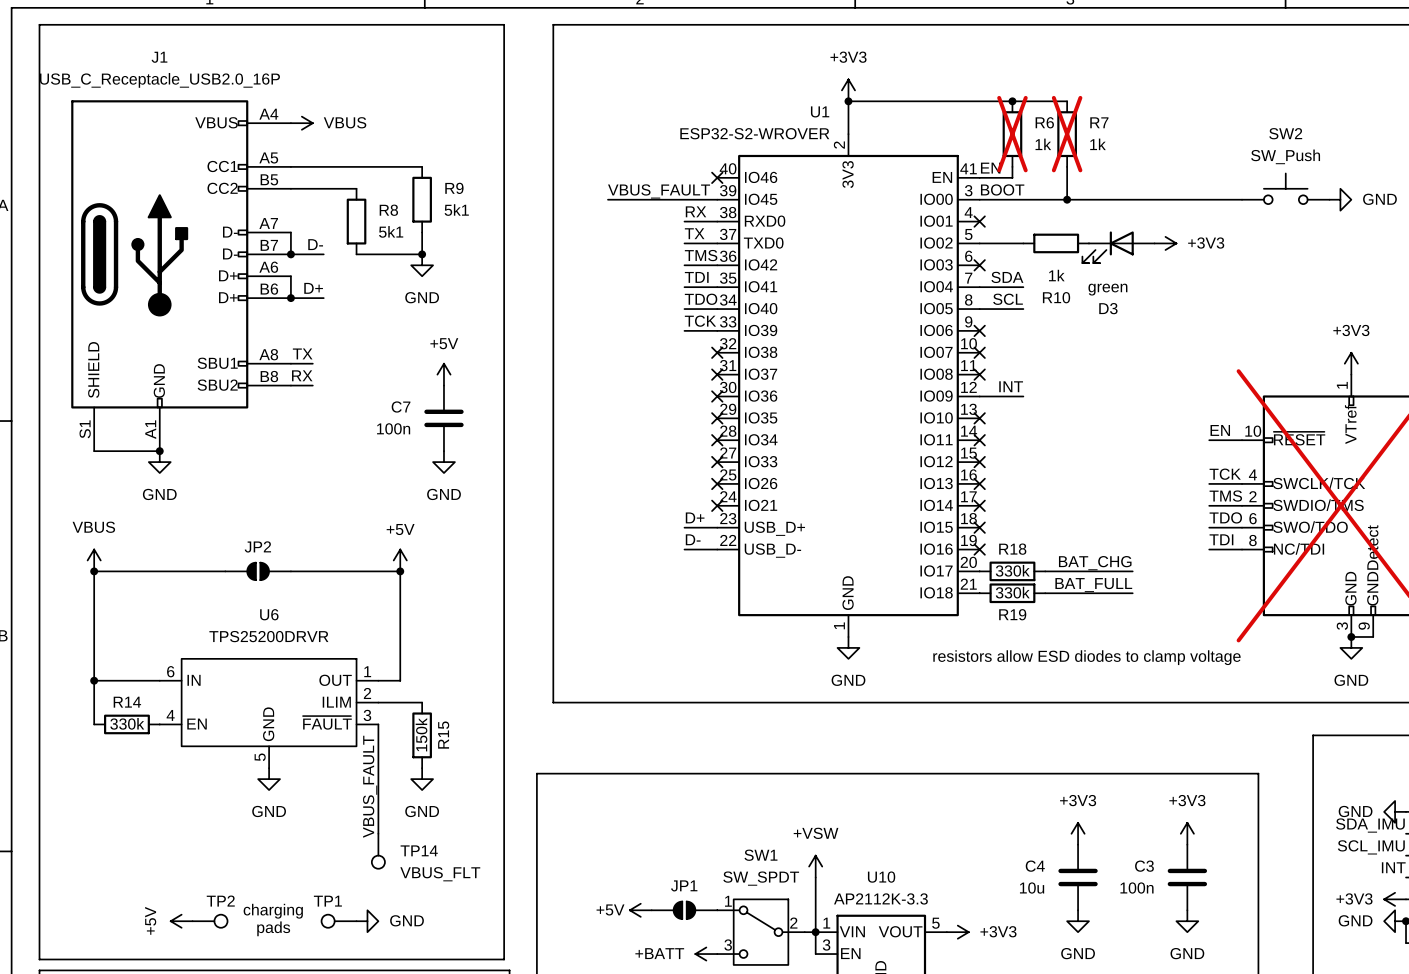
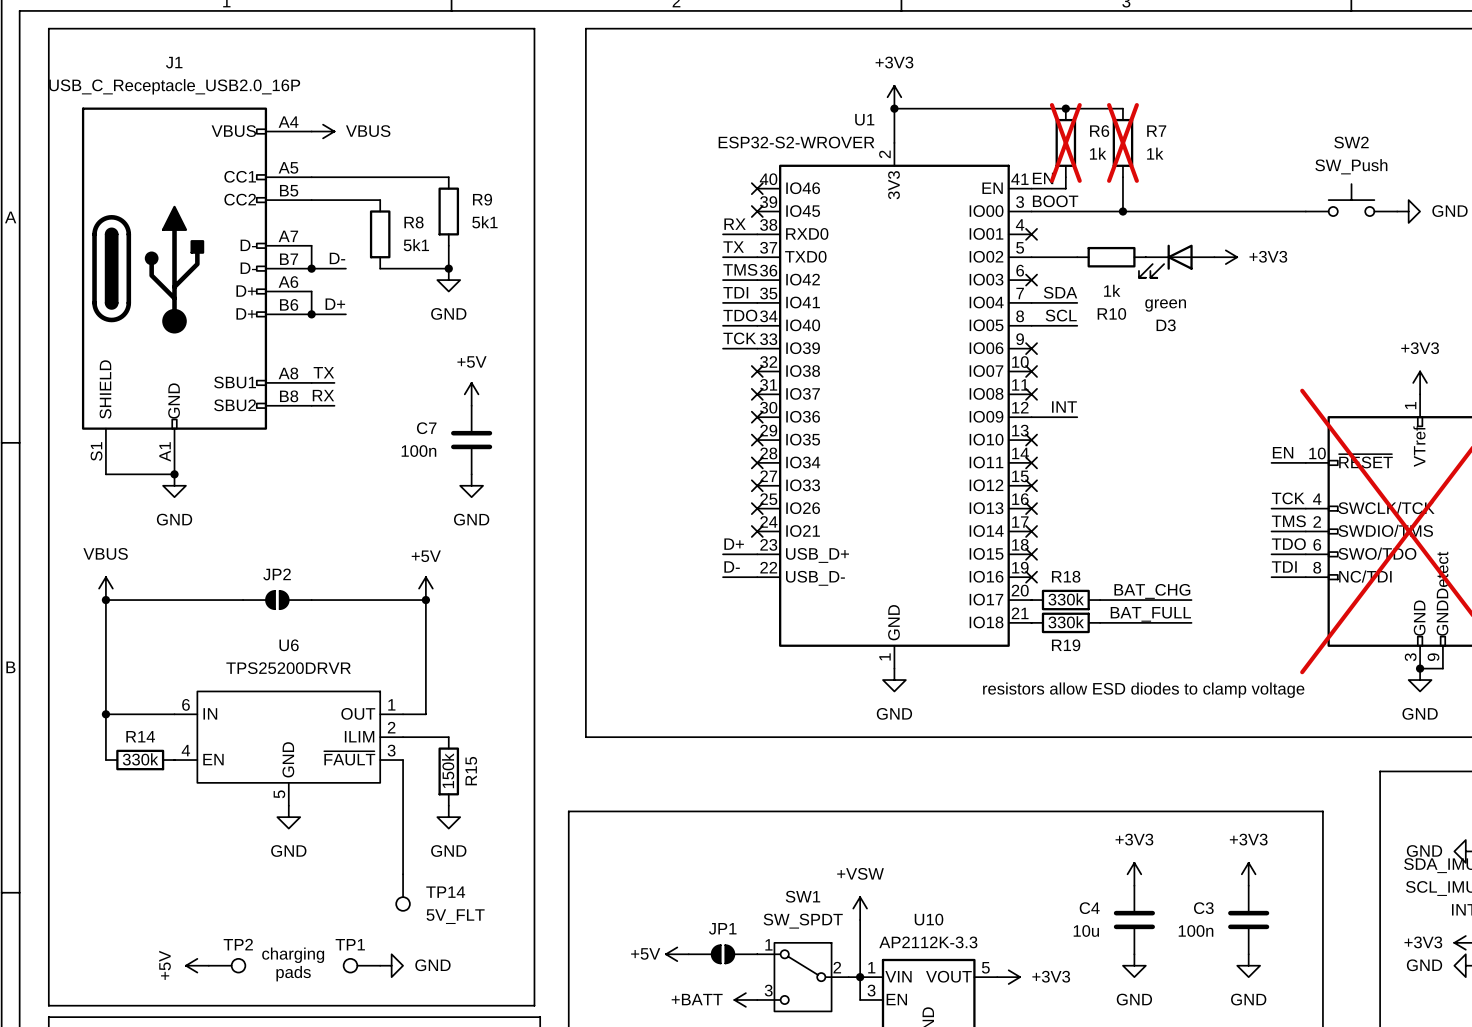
label: VBUS_FAULT (659, 191) -> none
wire: (607, 199) (717, 199) -> none
no-connect mark: none -> (757, 211)
label: VBUS_FAULT (370, 786) -> none
TP14 value: VBUS_FLT (440, 874) -> 5V_FLT (455, 916)

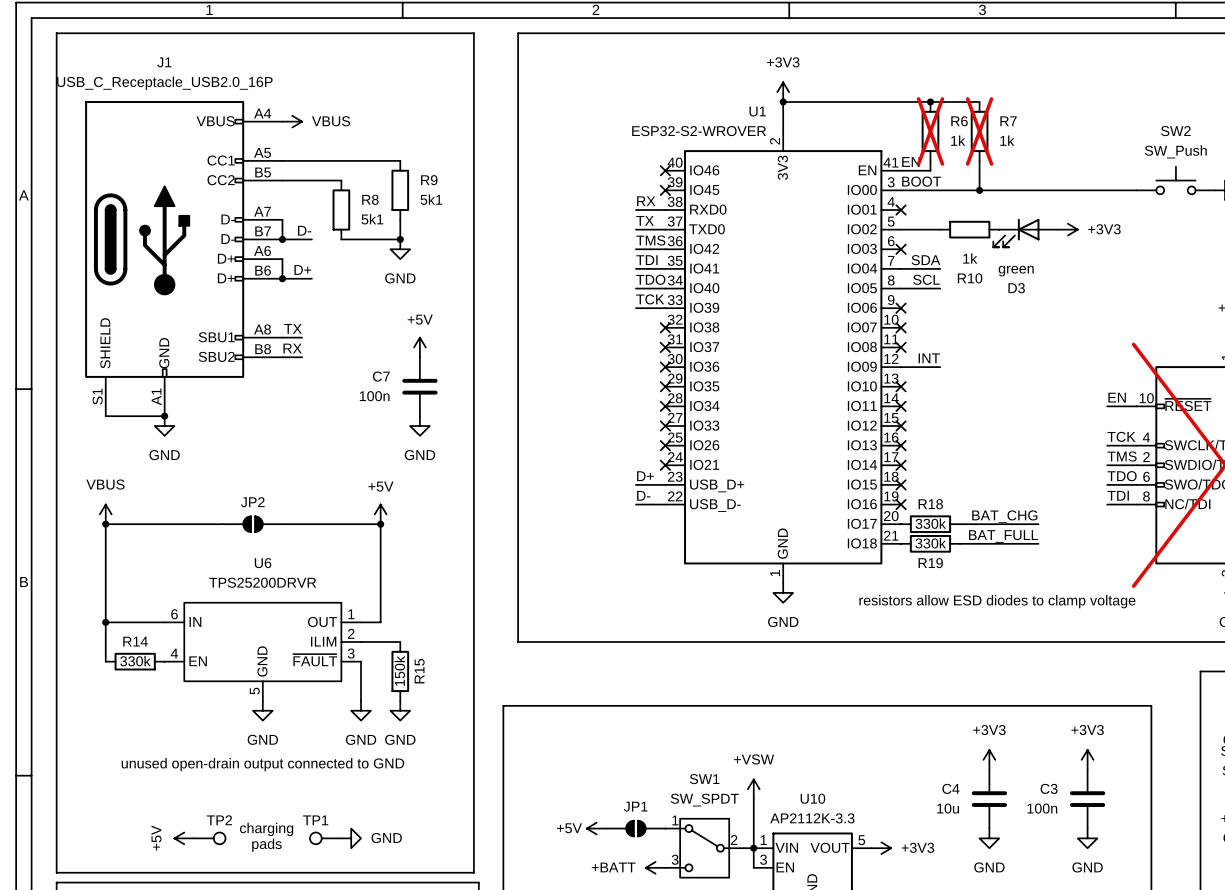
wire: (403, 805) (403, 874) -> none
power symbol: none -> GND (361, 710)
text: none -> unused open-drain output connected to GND (262, 764)
TP14: 5V_FLT (403, 892) -> none

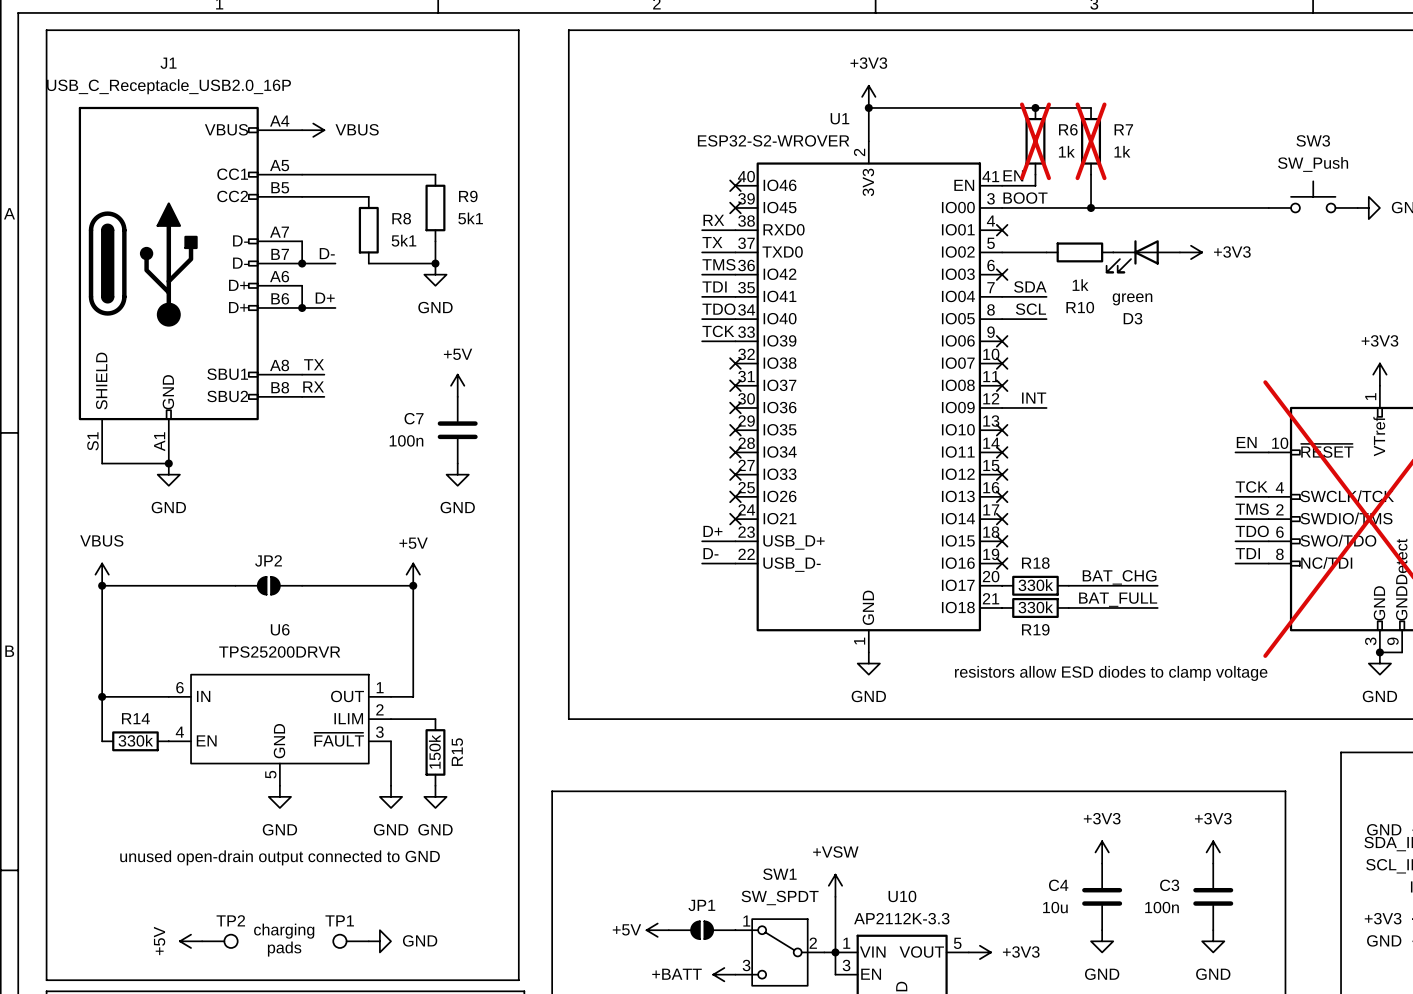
SW2 name: SW2 (1175, 131) -> SW3 (1313, 140)

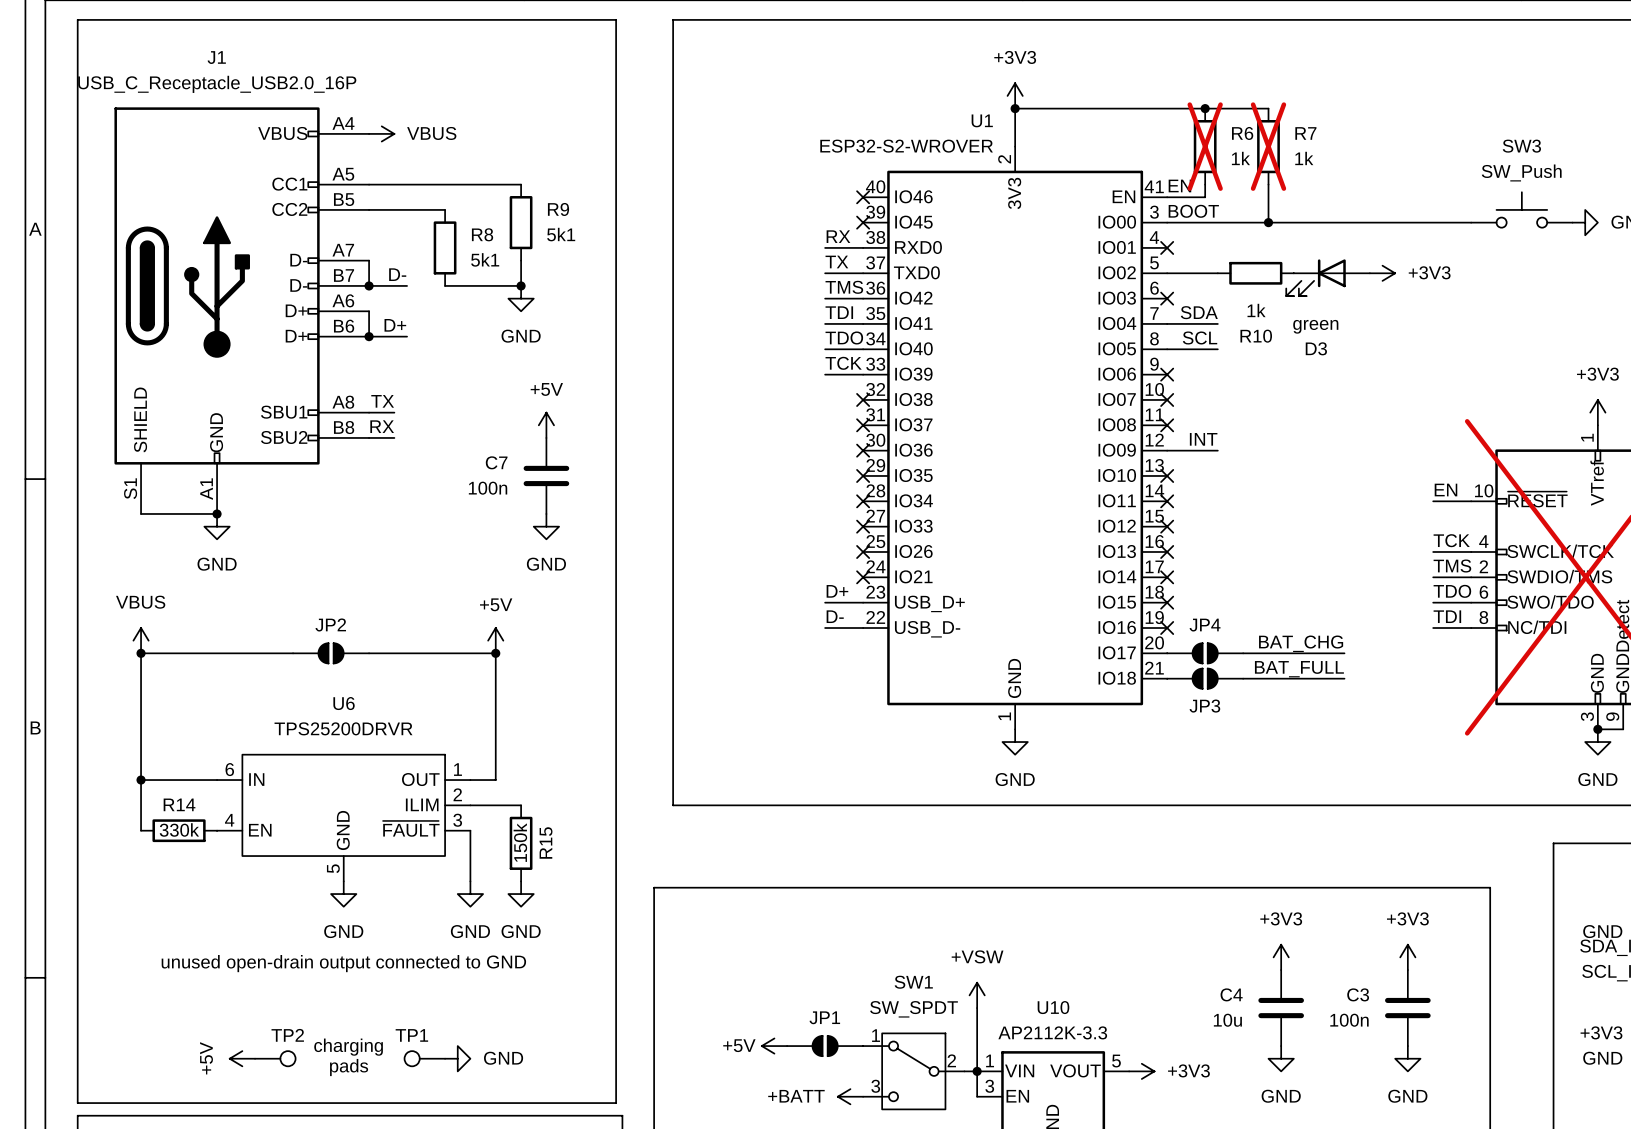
R18: 330k (1035, 585) -> none
JP4: none -> (1205, 653)
R19: 330k (1035, 607) -> none
JP3: none -> (1205, 678)
text: resistors allow ESD diodes to clamp voltage (1111, 673) -> none

